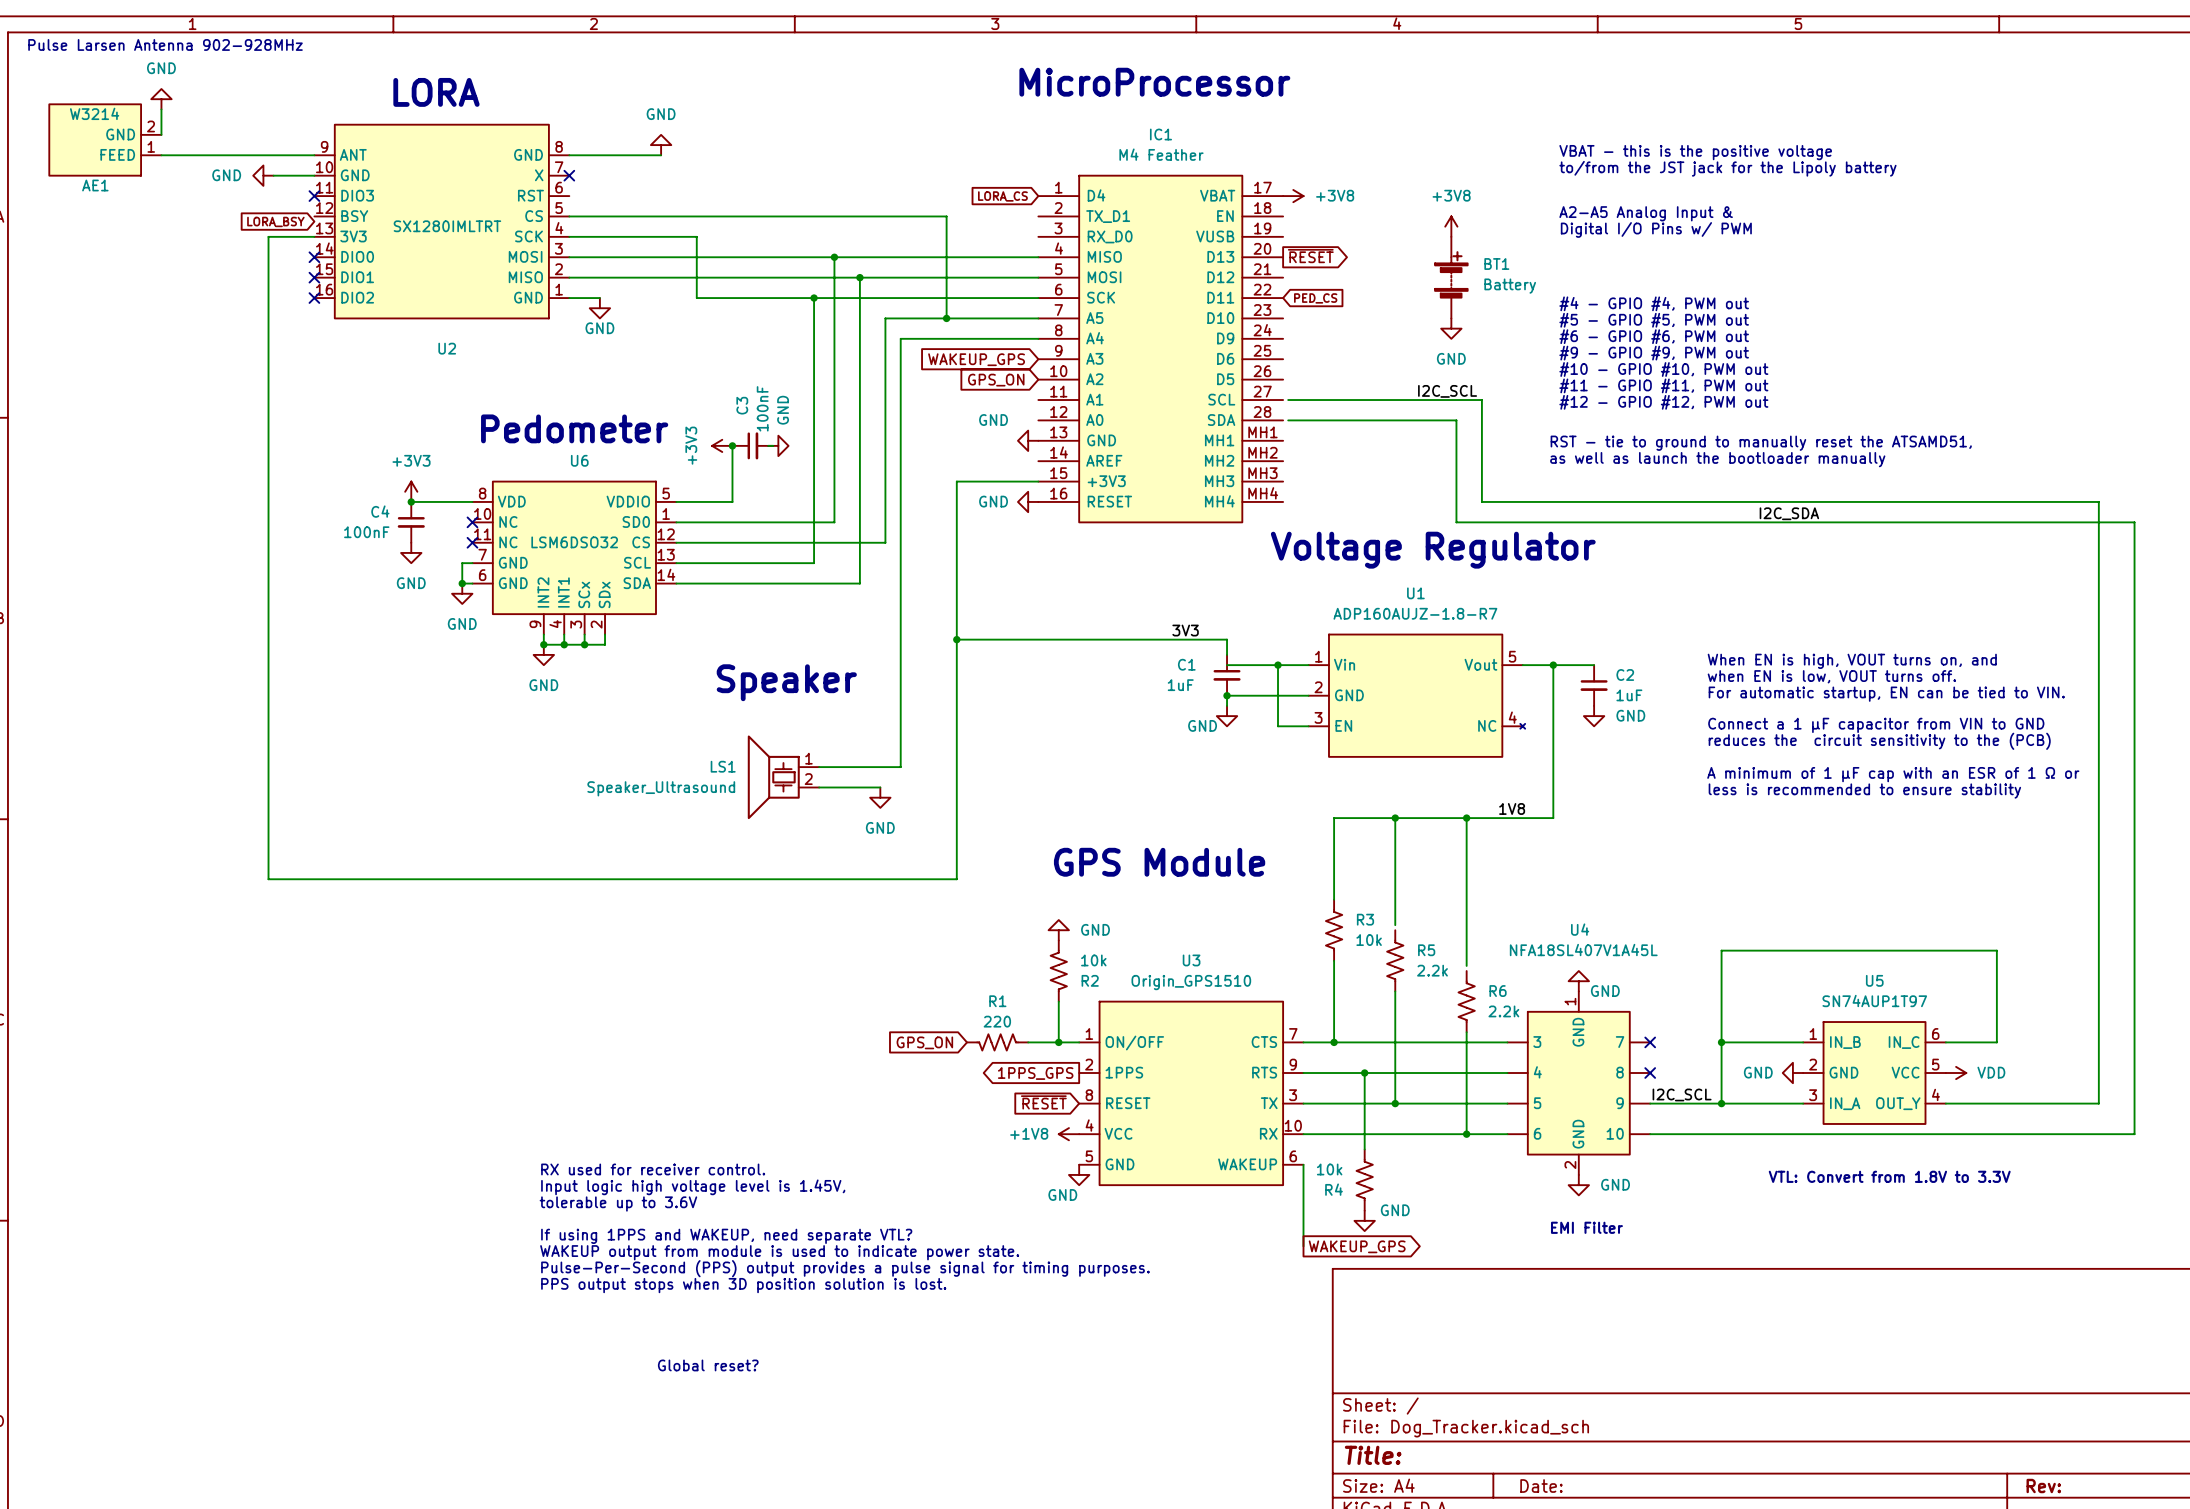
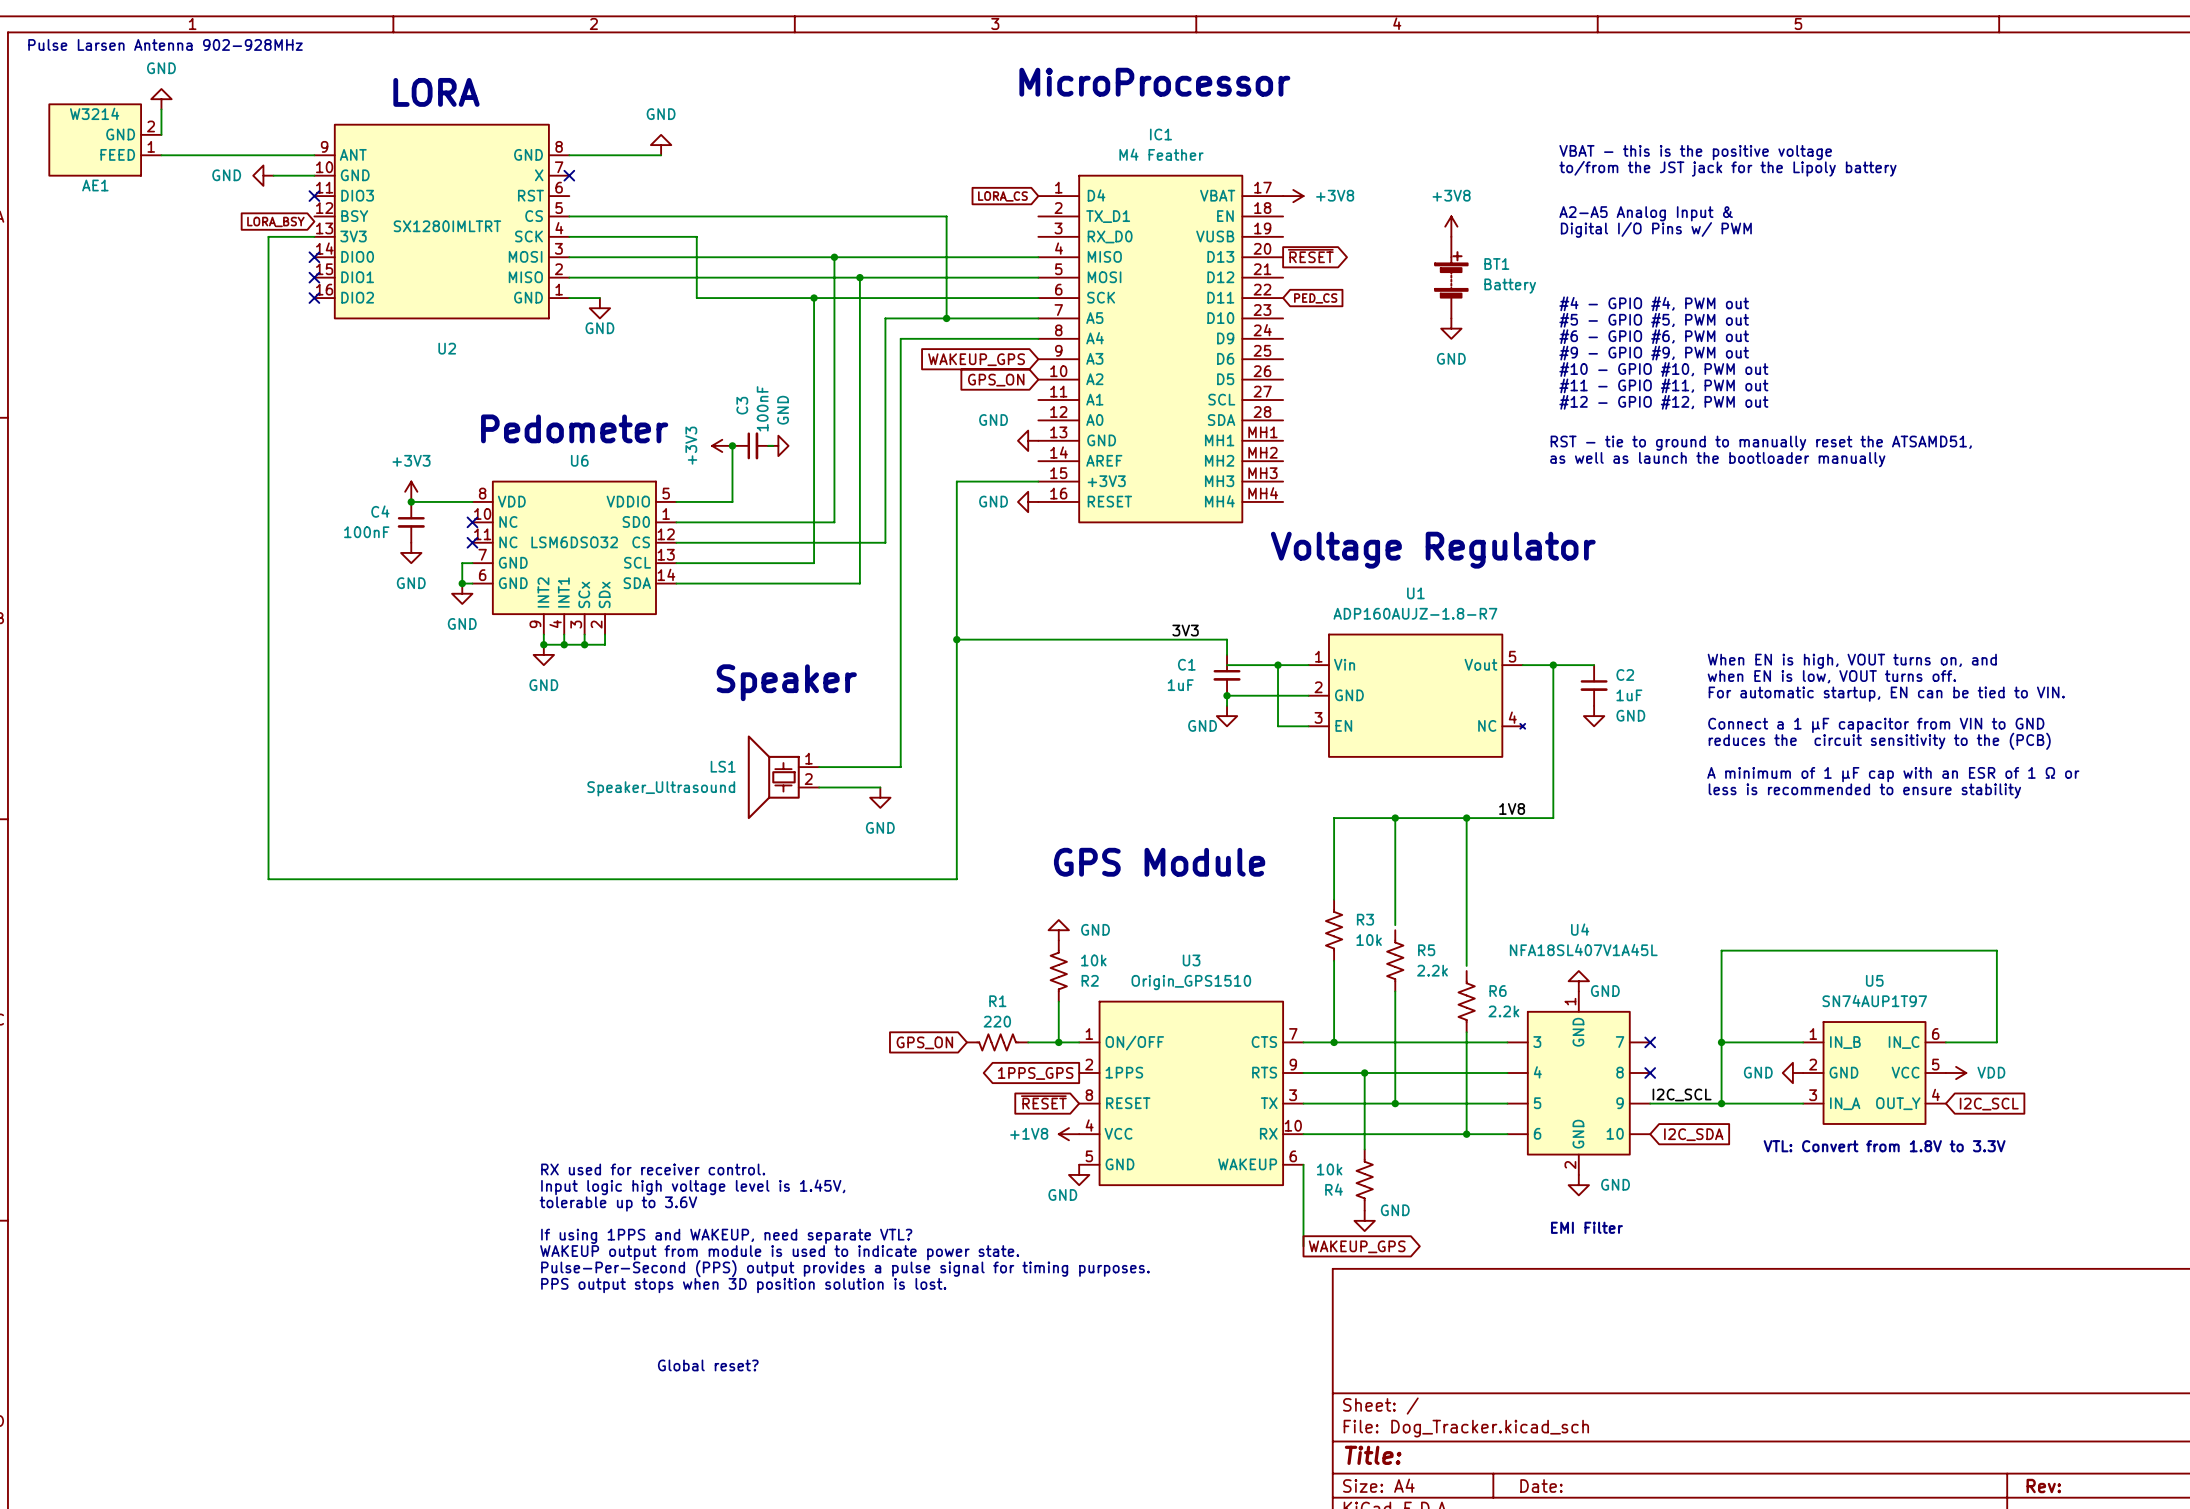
label: I2C_SCL (1447, 391) -> none
wire: (1288, 400) (1481, 400) (1481, 501) (2098, 501) (2098, 1103) (1945, 1103) -> none
wire: (1288, 420) (1456, 420) (1456, 522) (2134, 522) (2134, 1134) (1650, 1134) -> none
label: I2C_SDA (1789, 513) -> none
global label: none -> I2C_SCL (1989, 1104)
global label: none -> I2C_SDA (1693, 1134)
text position: VTL: Convert from 1.8V to 3.3V (1889, 1176) -> VTL: Convert from 1.8V to 3.3V (1884, 1146)

